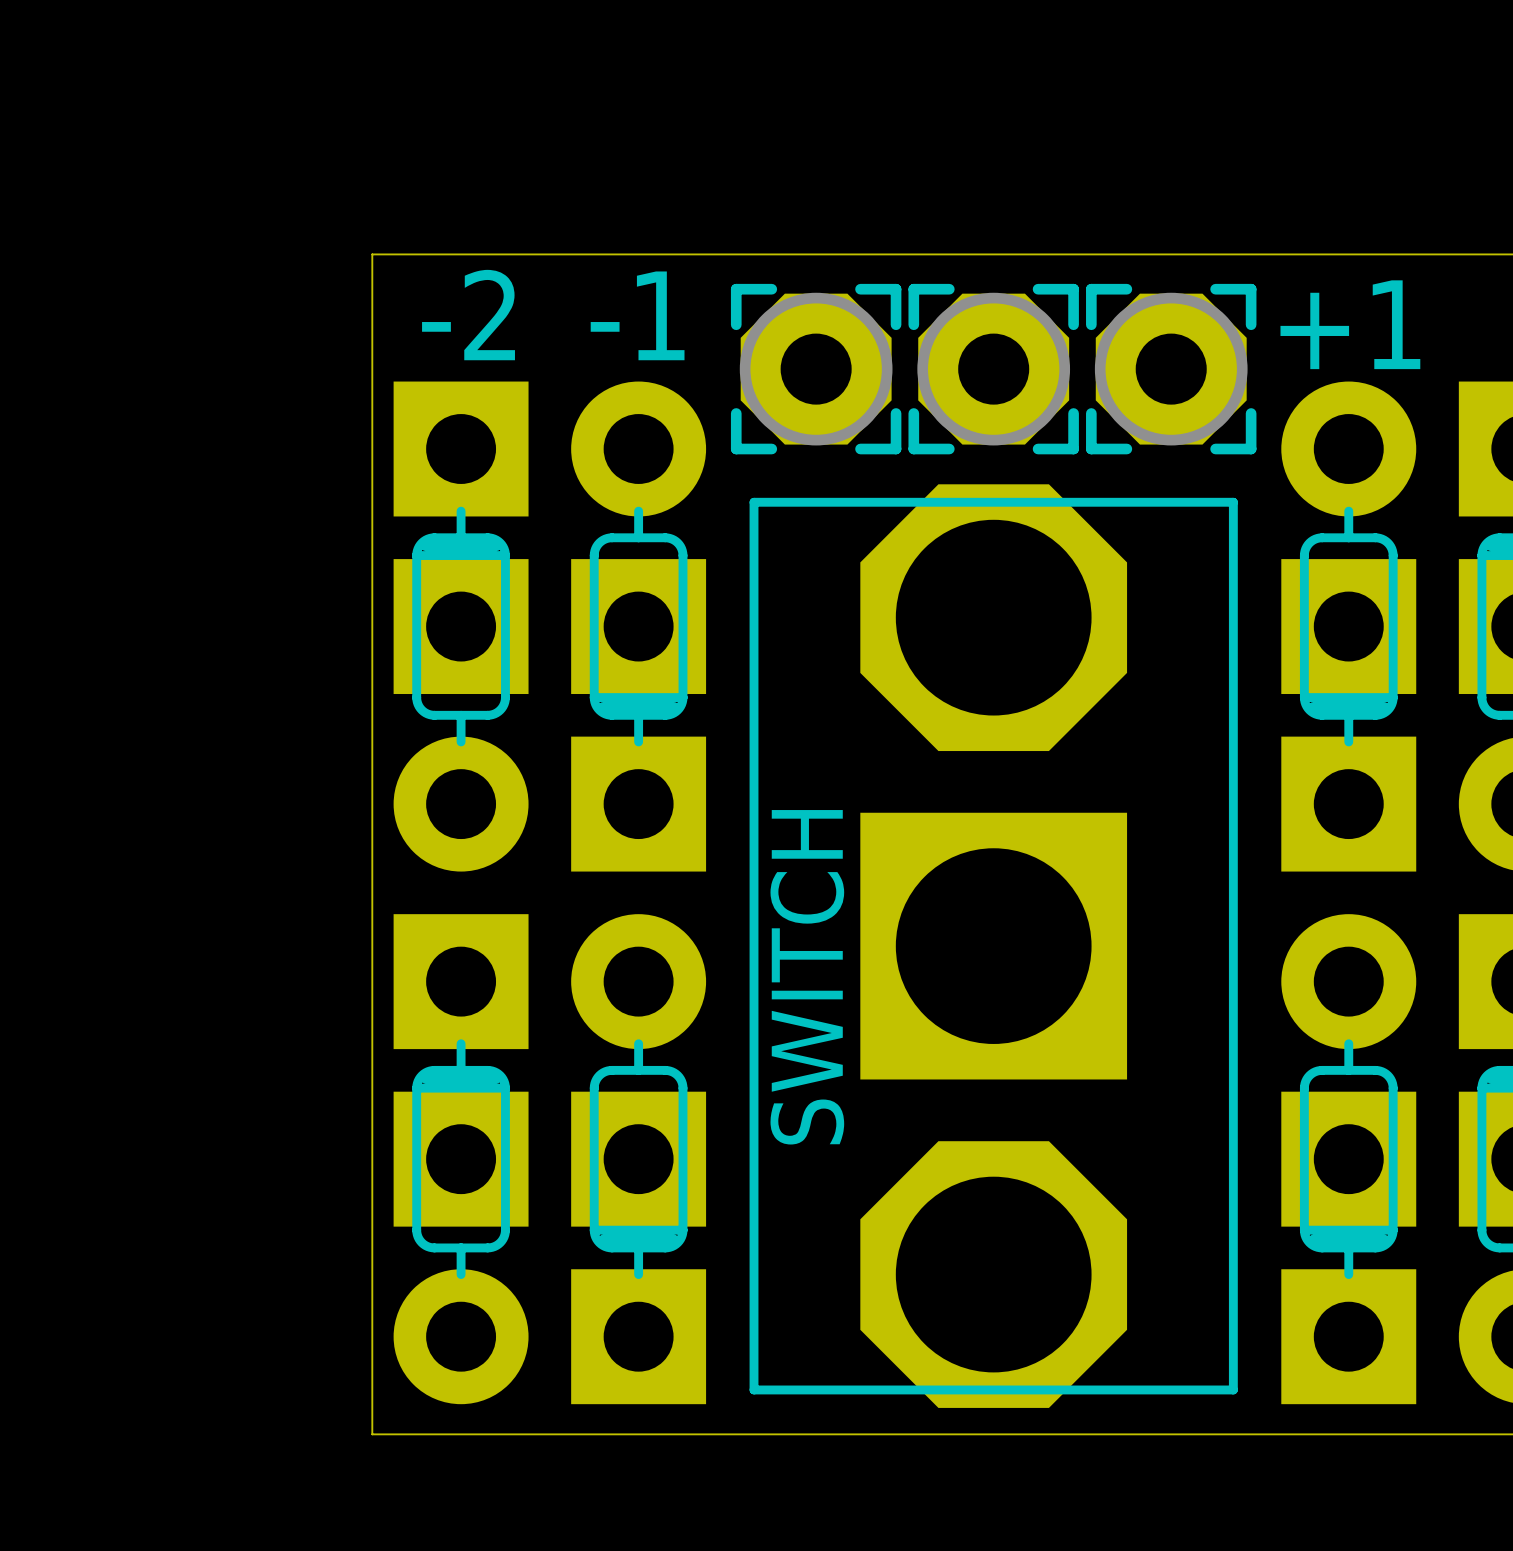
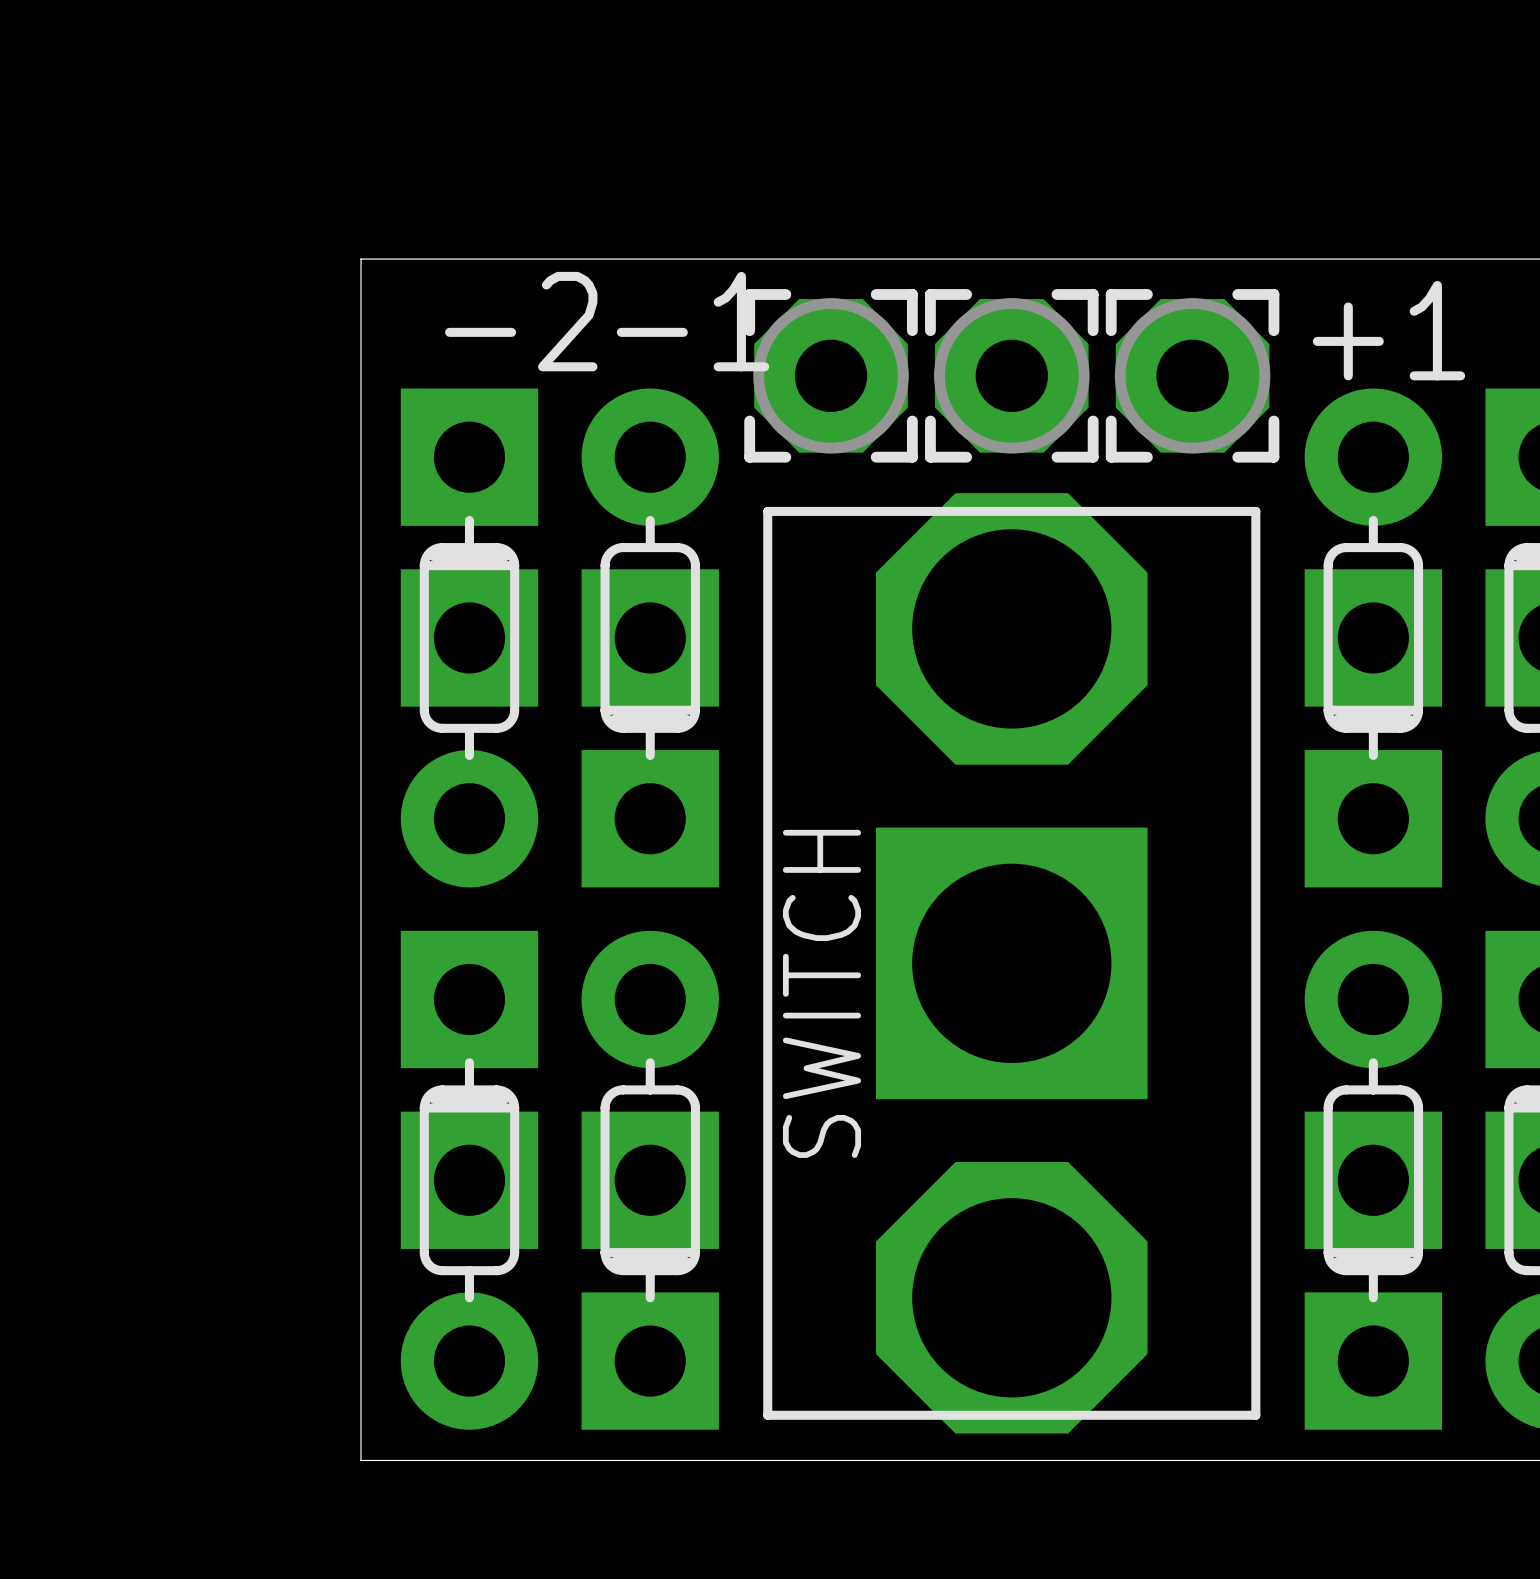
board edge: (372, 254) (372, 1434) -> (379, 259) (361, 259) (361, 1460) (379, 1460)

